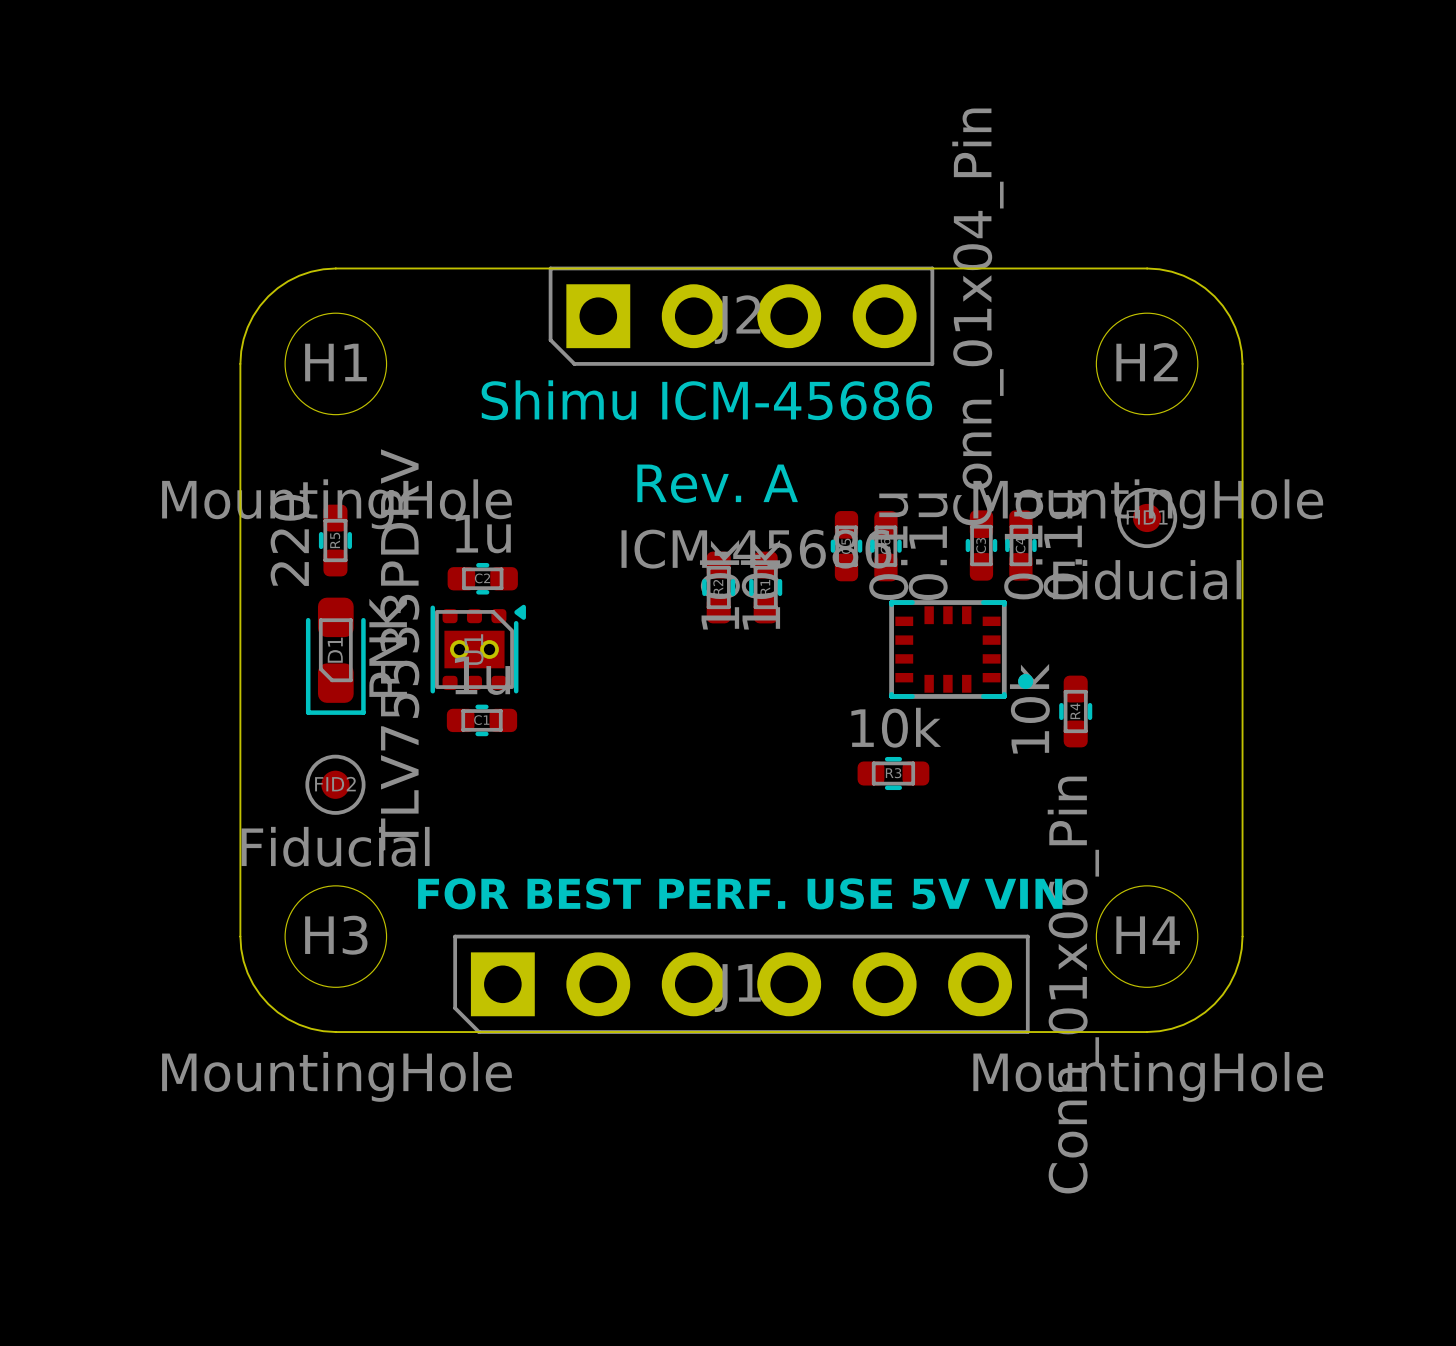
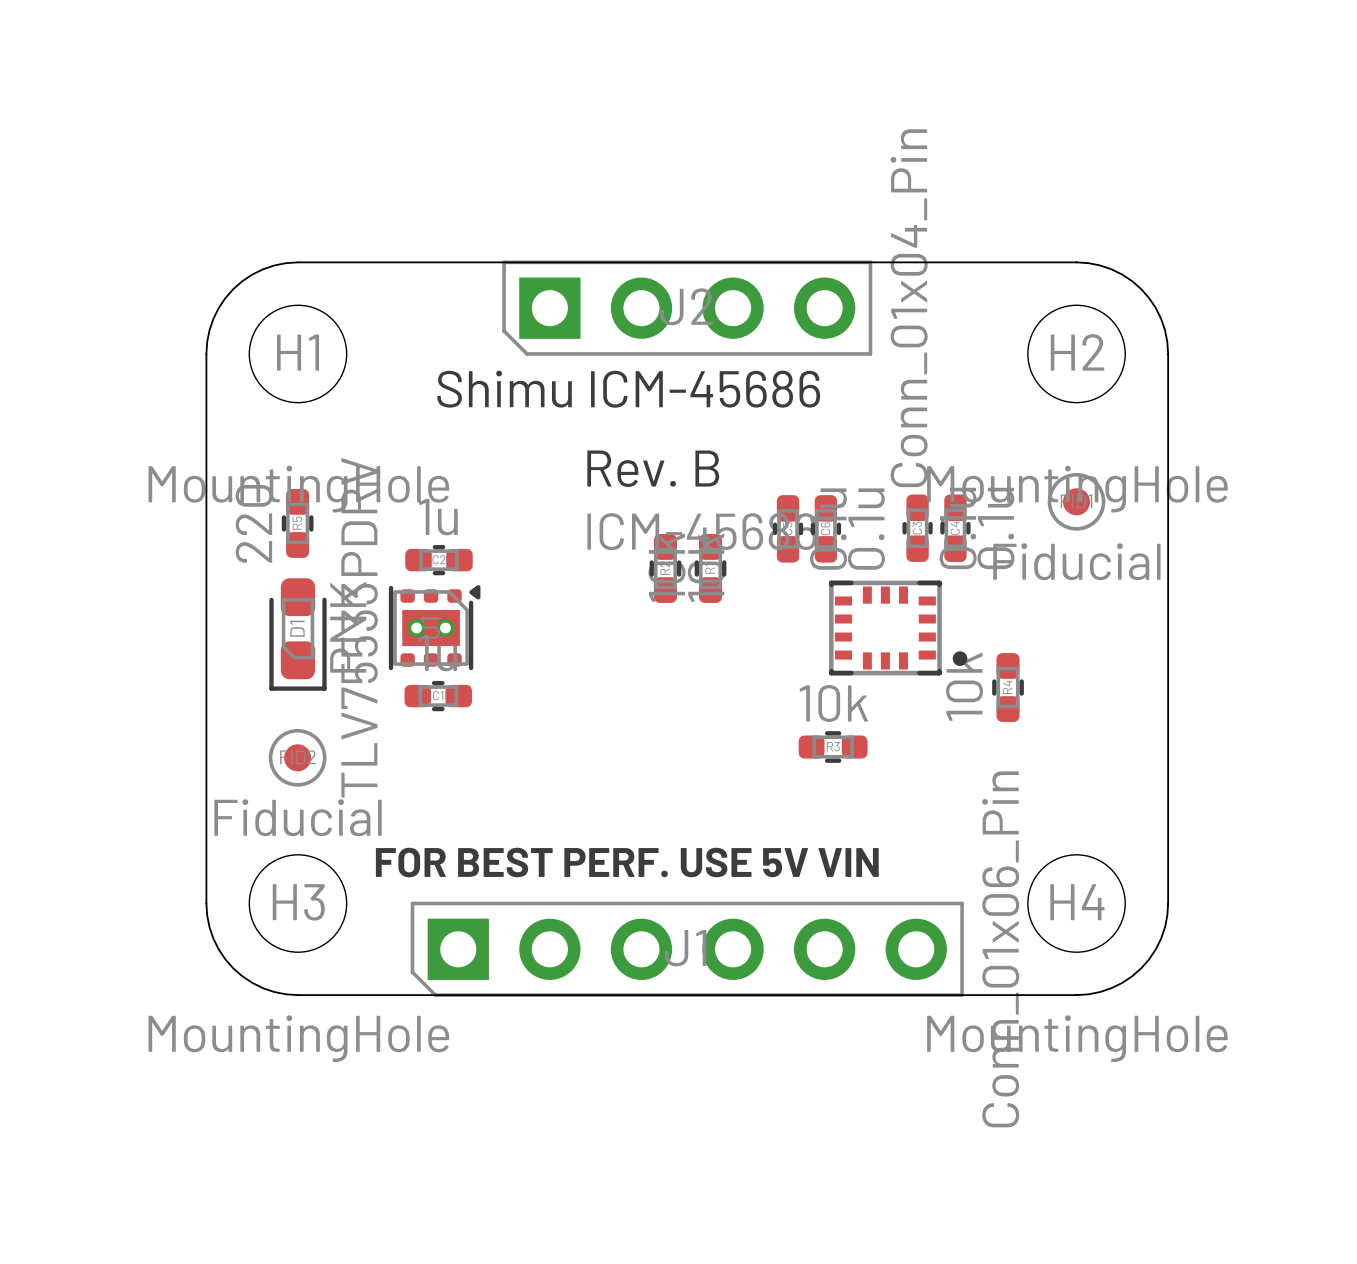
text: Rev. A (717, 483) -> Rev. B (653, 468)

